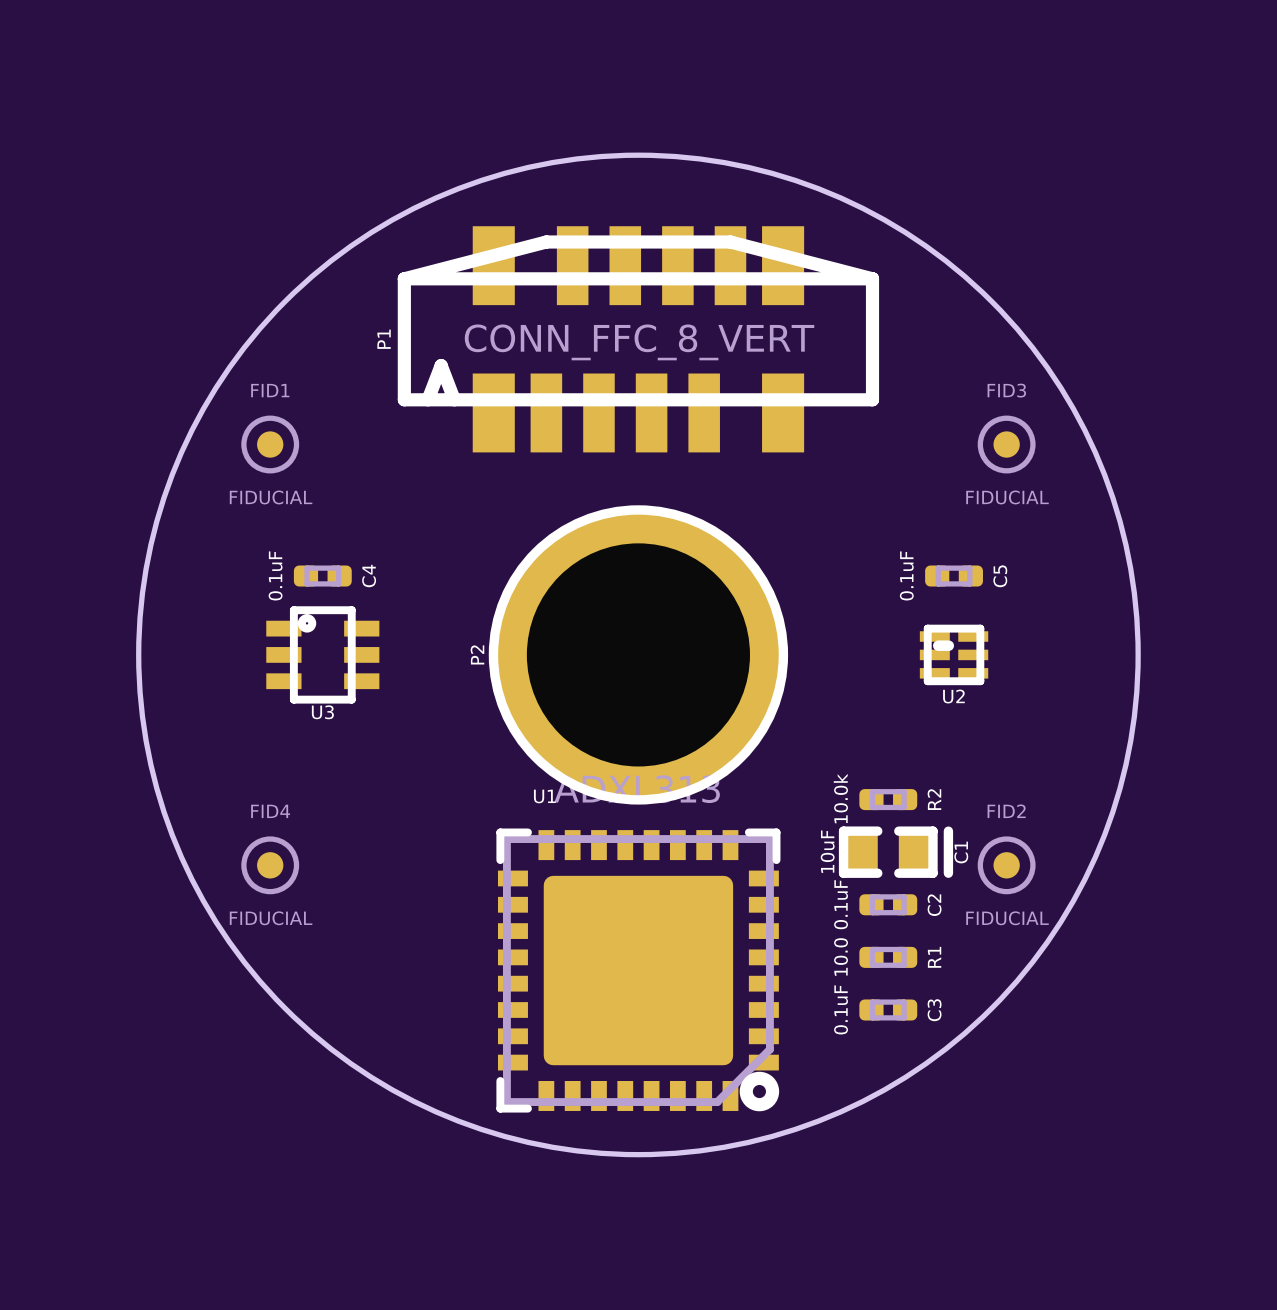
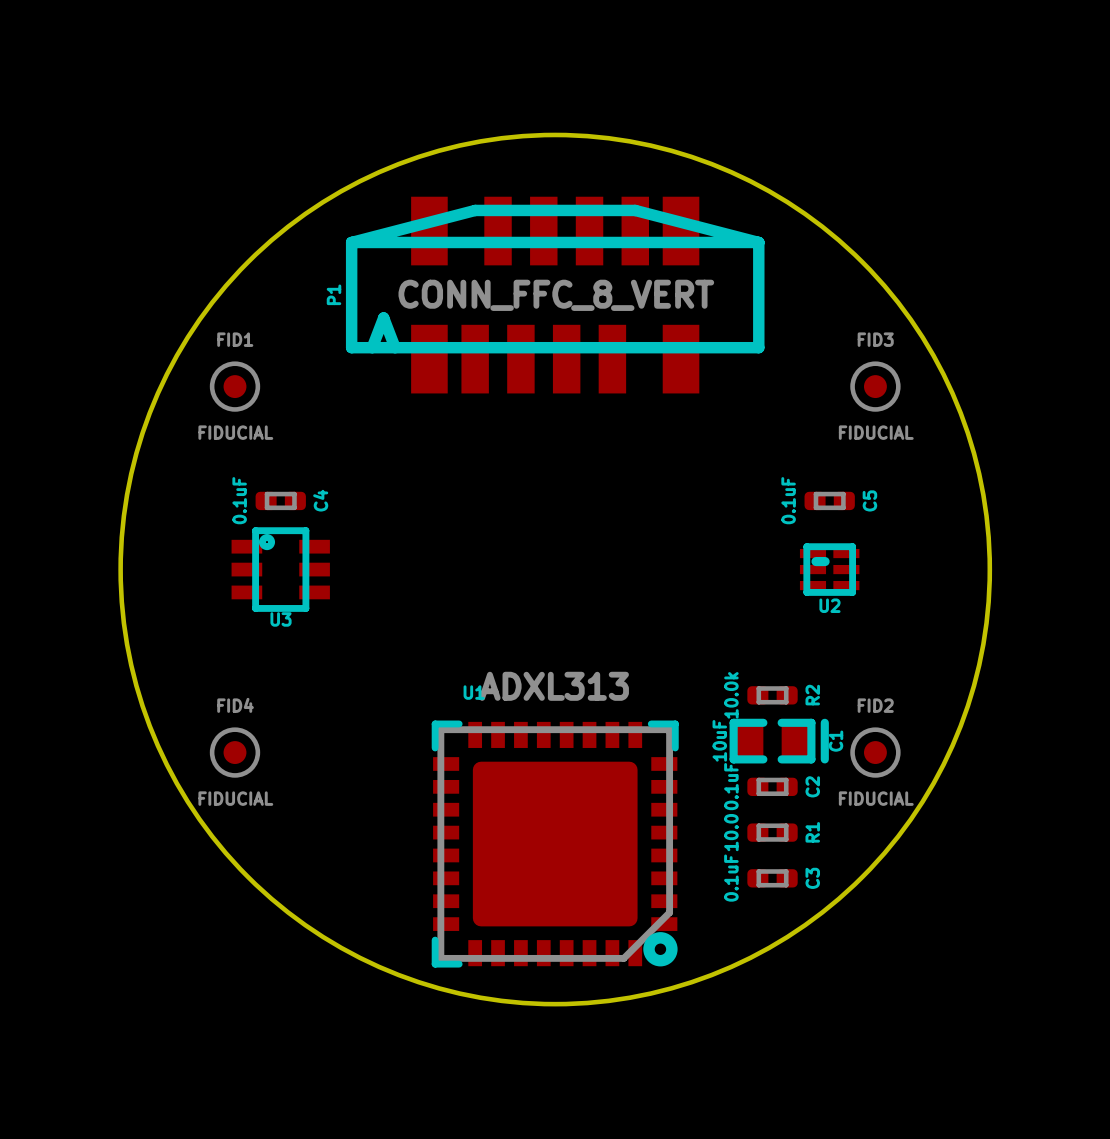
P2: (638, 654) -> none

